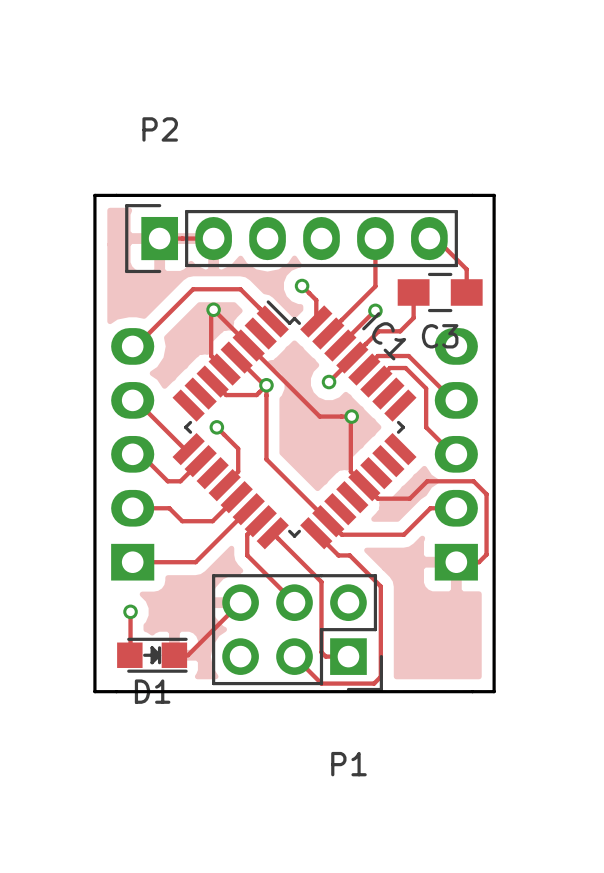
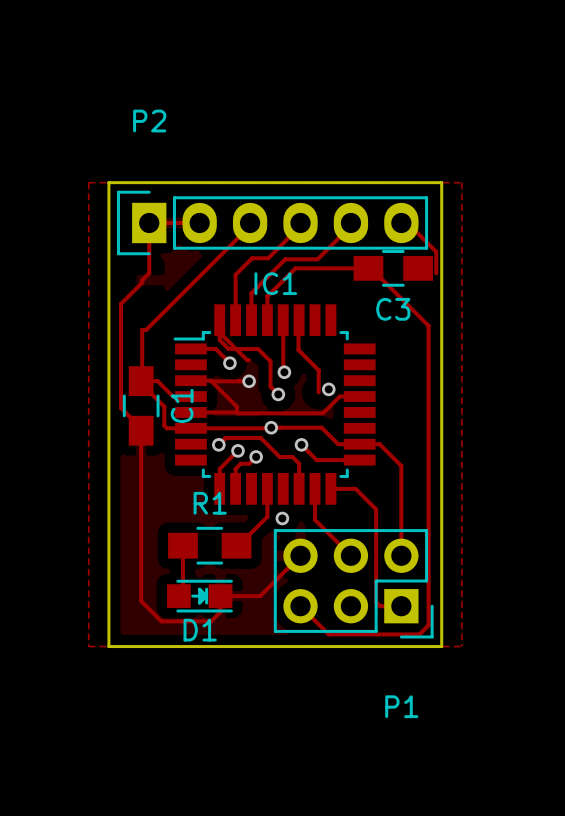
board edge: (116, 195) (94, 195) (94, 691) (116, 691) -> (108, 182) (108, 646)
board edge: (472, 195) (494, 195) (494, 691) (472, 691) -> (441, 182) (441, 646)
track: none -> (149, 222) (149, 273) (121, 303) (121, 408) (141, 428) (141, 601) (161, 621) (211, 621) (220, 612) (220, 596) (260, 596) (300, 555)
track: none -> (250, 226) (146, 329) (142, 329) (141, 381)
track: none -> (300, 226) (268, 258) (252, 258) (235, 274) (235, 320)
track: (375, 241) (375, 286) (328, 333) -> (350, 226) (317, 259) (285, 259) (251, 293) (251, 320)
track: (302, 286) (316, 300) (316, 321) -> none
via: (302, 286) -> none
track: (413, 292) (413, 317) (400, 331) (378, 331) (329, 382) -> none
C3 position: (440, 292) -> (393, 268)
via: (213, 309) -> none
track: (375, 310) (340, 345) -> none
via: (375, 310) -> none
track: (272, 321) (240, 289) (193, 289) (135, 346) (132, 346) -> none
track: none -> (219, 320) (219, 340) (228, 349) (258, 349) (270, 361) (270, 386) (278, 394)
track: none -> (267, 320) (267, 296) (295, 268) (371, 268) (428, 325) (428, 625) (419, 634) (328, 634) (300, 606)
track: none -> (283, 320) (284, 372)
track: none -> (299, 320) (298, 350) (318, 370) (318, 392)
track: (224, 369) (211, 356) (211, 312) (213, 309) (319, 416) (351, 416) (350, 471) (377, 498) (409, 498) (427, 481) (473, 481) (486, 494) (486, 554) (479, 562) (456, 562) -> none
track: (364, 369) (377, 356) (408, 356) (453, 400) (456, 400) -> none
track: none -> (190, 348) (215, 348) (229, 363)
track: (212, 381) (226, 395) (256, 395) (266, 385) (266, 459) (341, 534) (404, 534) (430, 508) (456, 508) -> none
track: (376, 381) (389, 368) (405, 368) (426, 388) (426, 427) (453, 454) (456, 454) -> none
via: (329, 382) -> none
via: (266, 385) -> none
via: none -> (229, 363)
via: none -> (284, 372)
track: (132, 400) (135, 400) (184, 449) (188, 449) -> none
track: none -> (141, 381) (141, 383) (164, 406) (164, 425) (167, 428) (321, 427) (338, 444) (379, 444) (401, 465) (401, 555)
track: none -> (141, 381) (157, 381) (173, 396) (190, 396)
track: none -> (190, 380) (210, 380) (236, 406) (236, 412)
track: none -> (211, 381) (249, 381)
via: none -> (249, 381)
via: none -> (278, 394)
IC1 rotation: 0° (294, 424) -> 45° counterclockwise (274, 404)
track: none -> (359, 396) (339, 396) (323, 413) (236, 412)
track: (216, 427) (238, 448) (238, 471) -> (299, 488) (299, 463) (292, 456) (279, 456) (260, 438) (225, 438) (222, 440)
via: (216, 427) -> none
C1: none -> (141, 405)
track: none -> (175, 412) (236, 412)
track: (132, 454) (140, 454) (167, 481) (180, 481) (200, 461) -> none
part: (132, 454) -> none
part: (456, 454) -> none
via: none -> (271, 427)
via: none -> (218, 444)
track: none -> (301, 444) (316, 460) (359, 460)
via: none -> (301, 444)
track: none -> (237, 450) (219, 468) (219, 488)
via: none -> (237, 450)
track: none -> (256, 456) (249, 463) (240, 463) (235, 468) (235, 488) (239, 485)
via: none -> (256, 456)
track: (236, 497) (212, 521) (182, 521) (169, 508) (132, 508) -> none
track: (248, 509) (195, 562) (132, 562) -> none
track: (260, 521) (247, 534) (247, 555) (294, 602) -> none
track: none -> (267, 488) (267, 516) (236, 545)
track: none -> (315, 488) (315, 519) (350, 555)
track: none -> (330, 488) (355, 488) (376, 509) (376, 602) (380, 606) (401, 606)
track: (272, 533) (321, 581) (321, 652) (325, 656) (348, 656) -> none
track: (316, 533) (338, 555) (349, 555) (380, 586) (380, 676) (374, 683) (321, 683) (294, 656) -> none
via: none -> (282, 518)
track: none -> (182, 545) (182, 592) (178, 596)
R1: none -> (209, 545)
track: (240, 602) (187, 655) (174, 655) -> none
track: (130, 611) (129, 655) -> none
via: (130, 611) -> none
P1 position: (297, 632) -> (353, 583)
D1 position: (152, 655) -> (199, 596)

